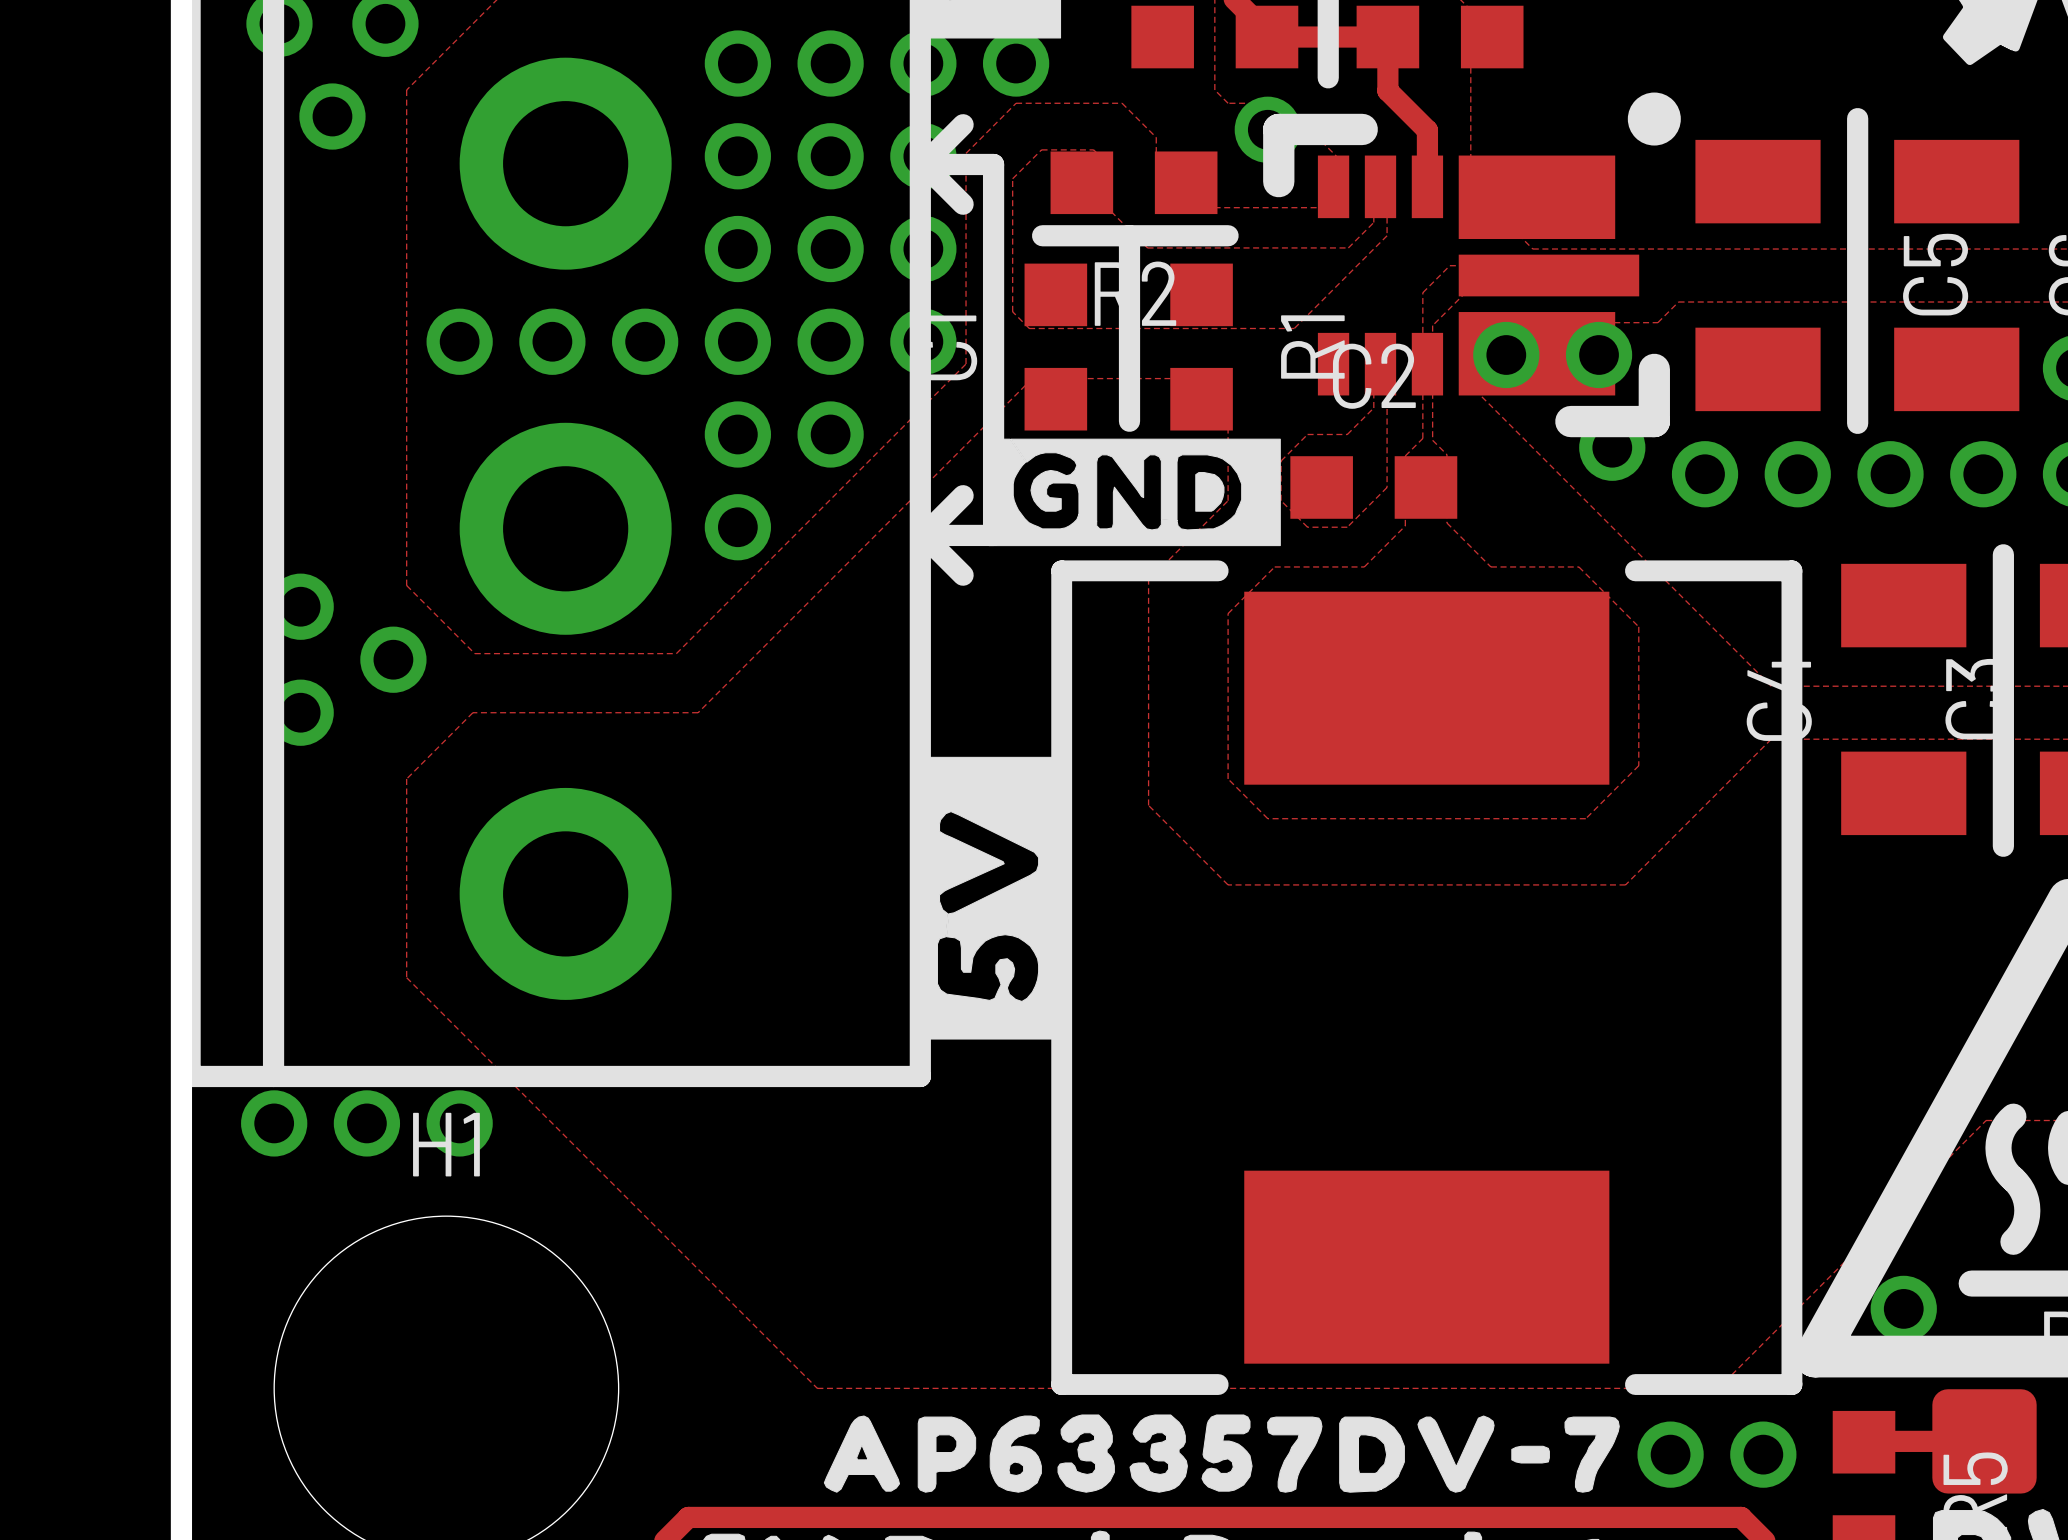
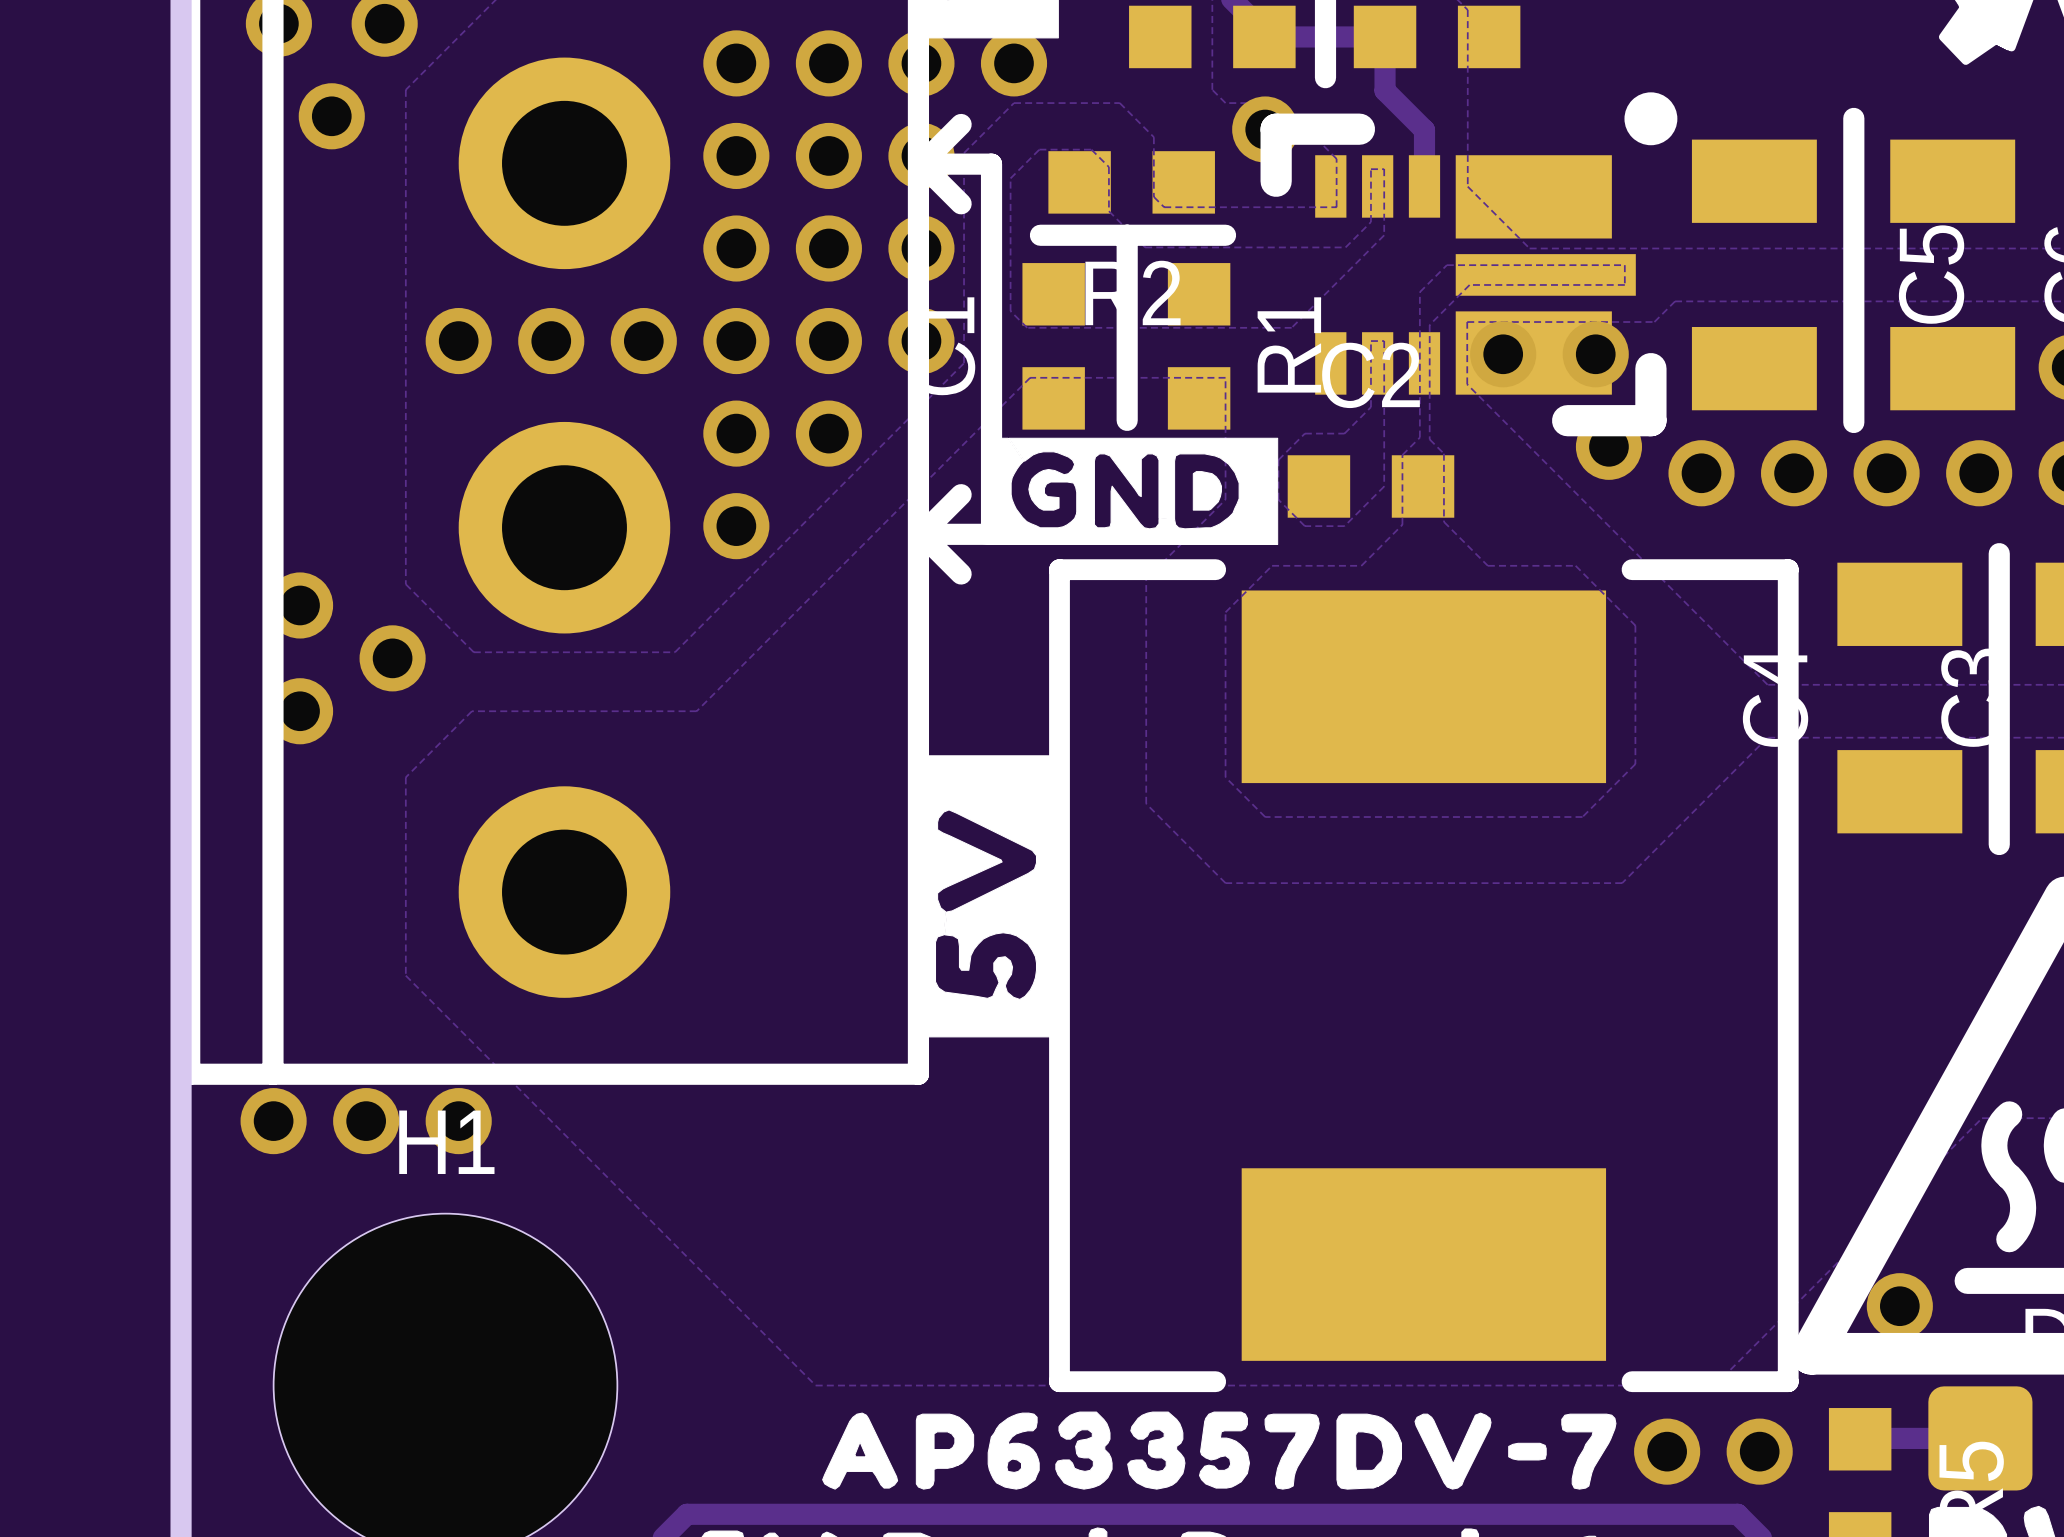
R1 name position: R1 (1312, 347) -> R1 (1289, 344)

